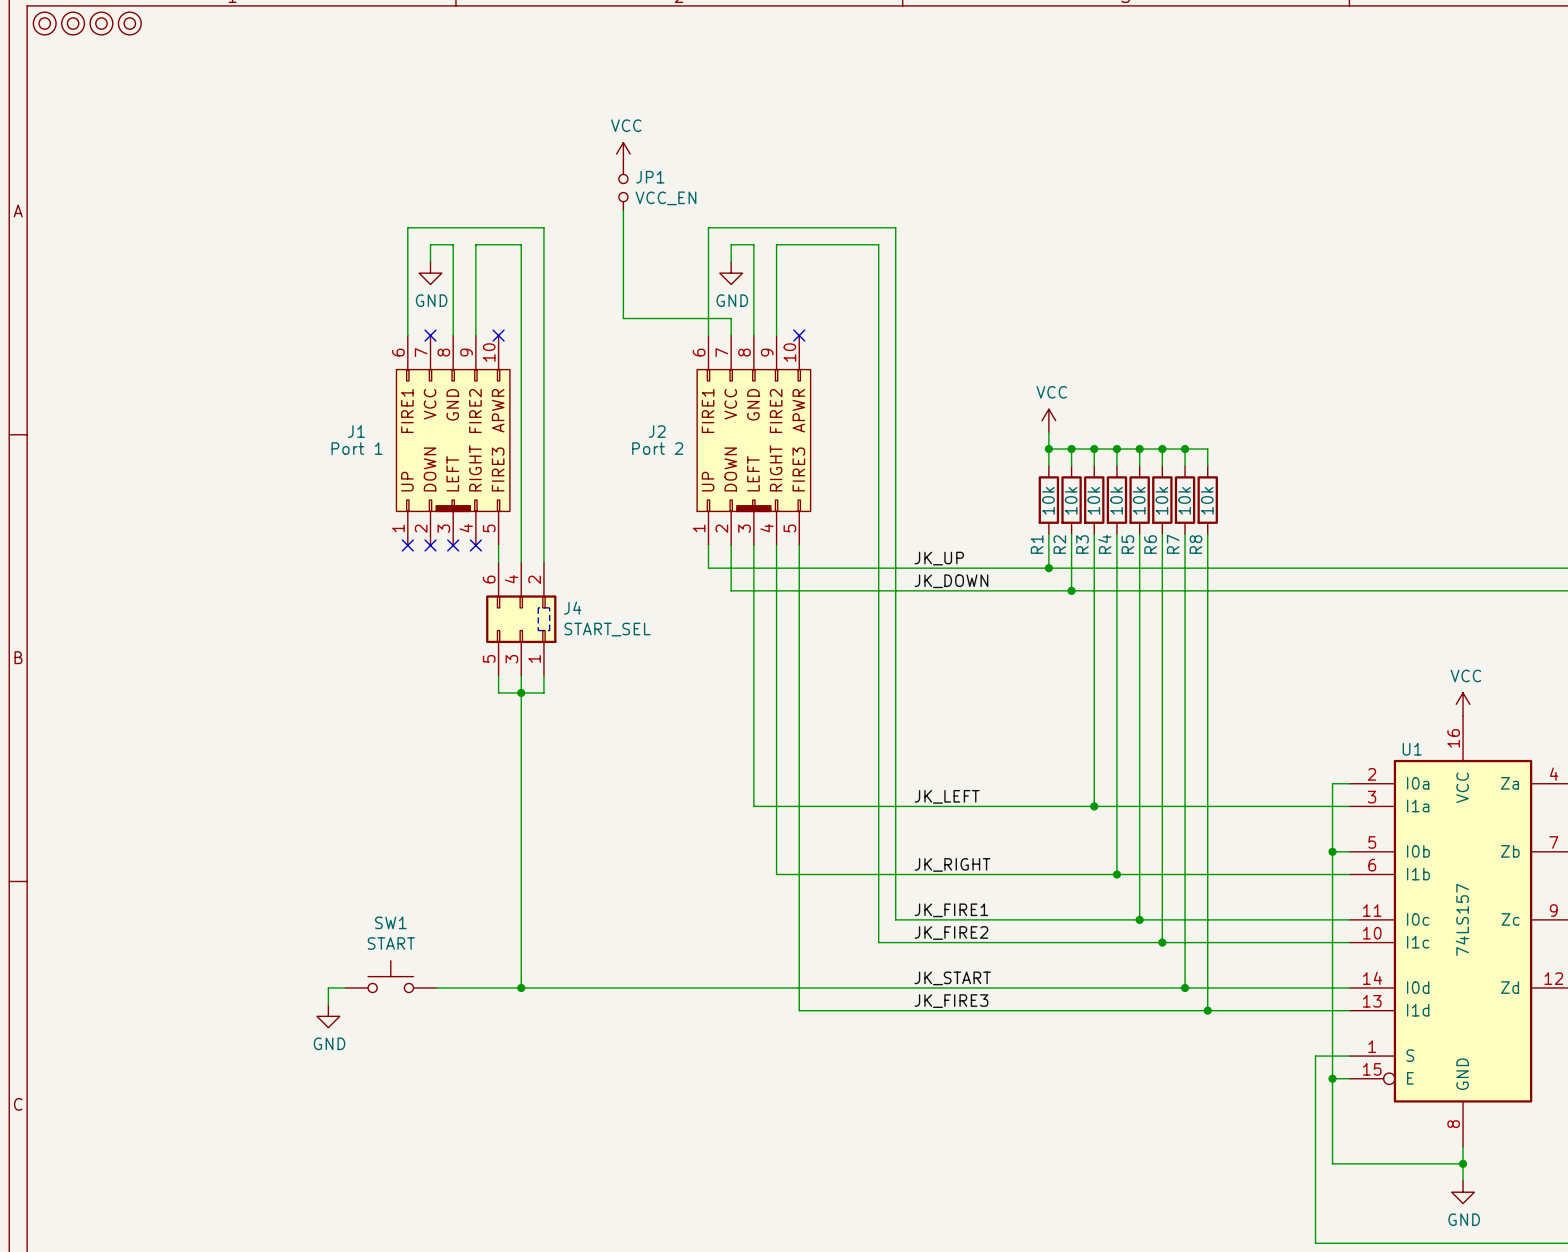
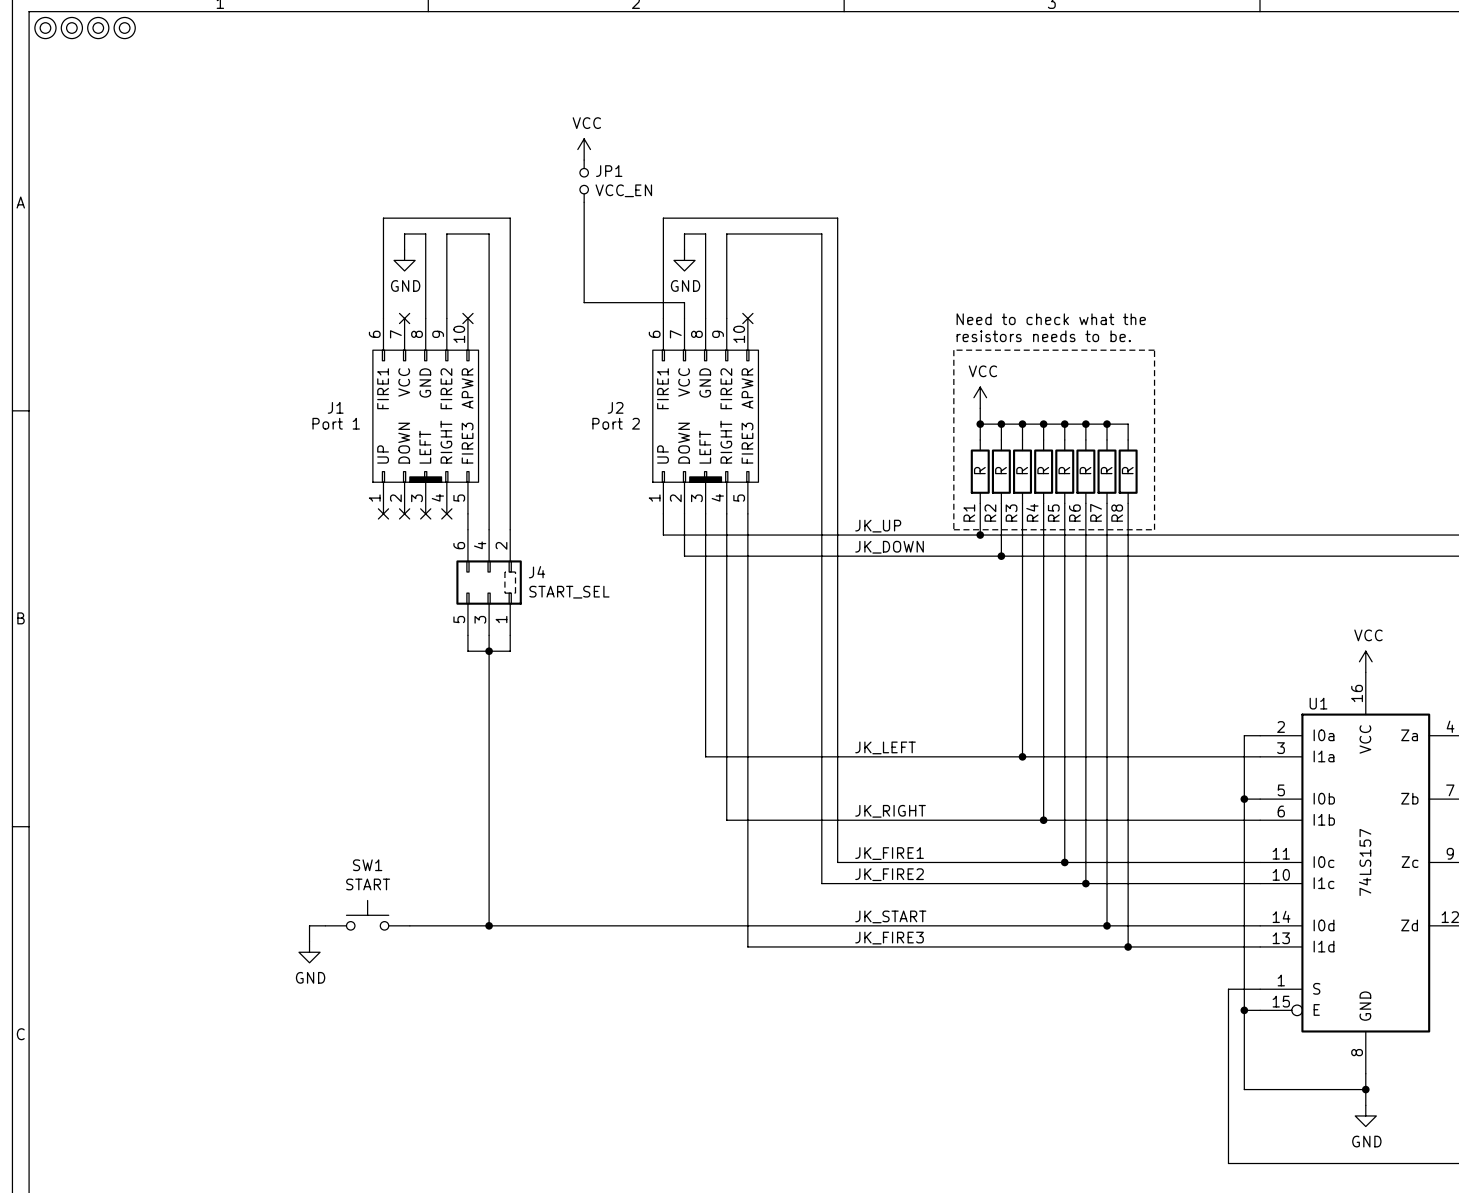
text: none -> Need to check what the (1051, 319)
text: none -> resistors needs to be. (1043, 336)
line: none -> (953, 350) (953, 529) (1154, 529) (1154, 350) (953, 350)
R1 value: 10k (1048, 500) -> R (979, 470)
R2 value: 10k (1071, 500) -> R (1000, 470)
R3 value: 10k (1093, 500) -> R (1022, 470)
R4 value: 10k (1116, 500) -> R (1043, 470)
R5 value: 10k (1139, 500) -> R (1064, 470)
R6 value: 10k (1161, 500) -> R (1085, 470)
R7 value: 10k (1184, 500) -> R (1106, 470)
R8 value: 10k (1207, 500) -> R (1127, 470)

